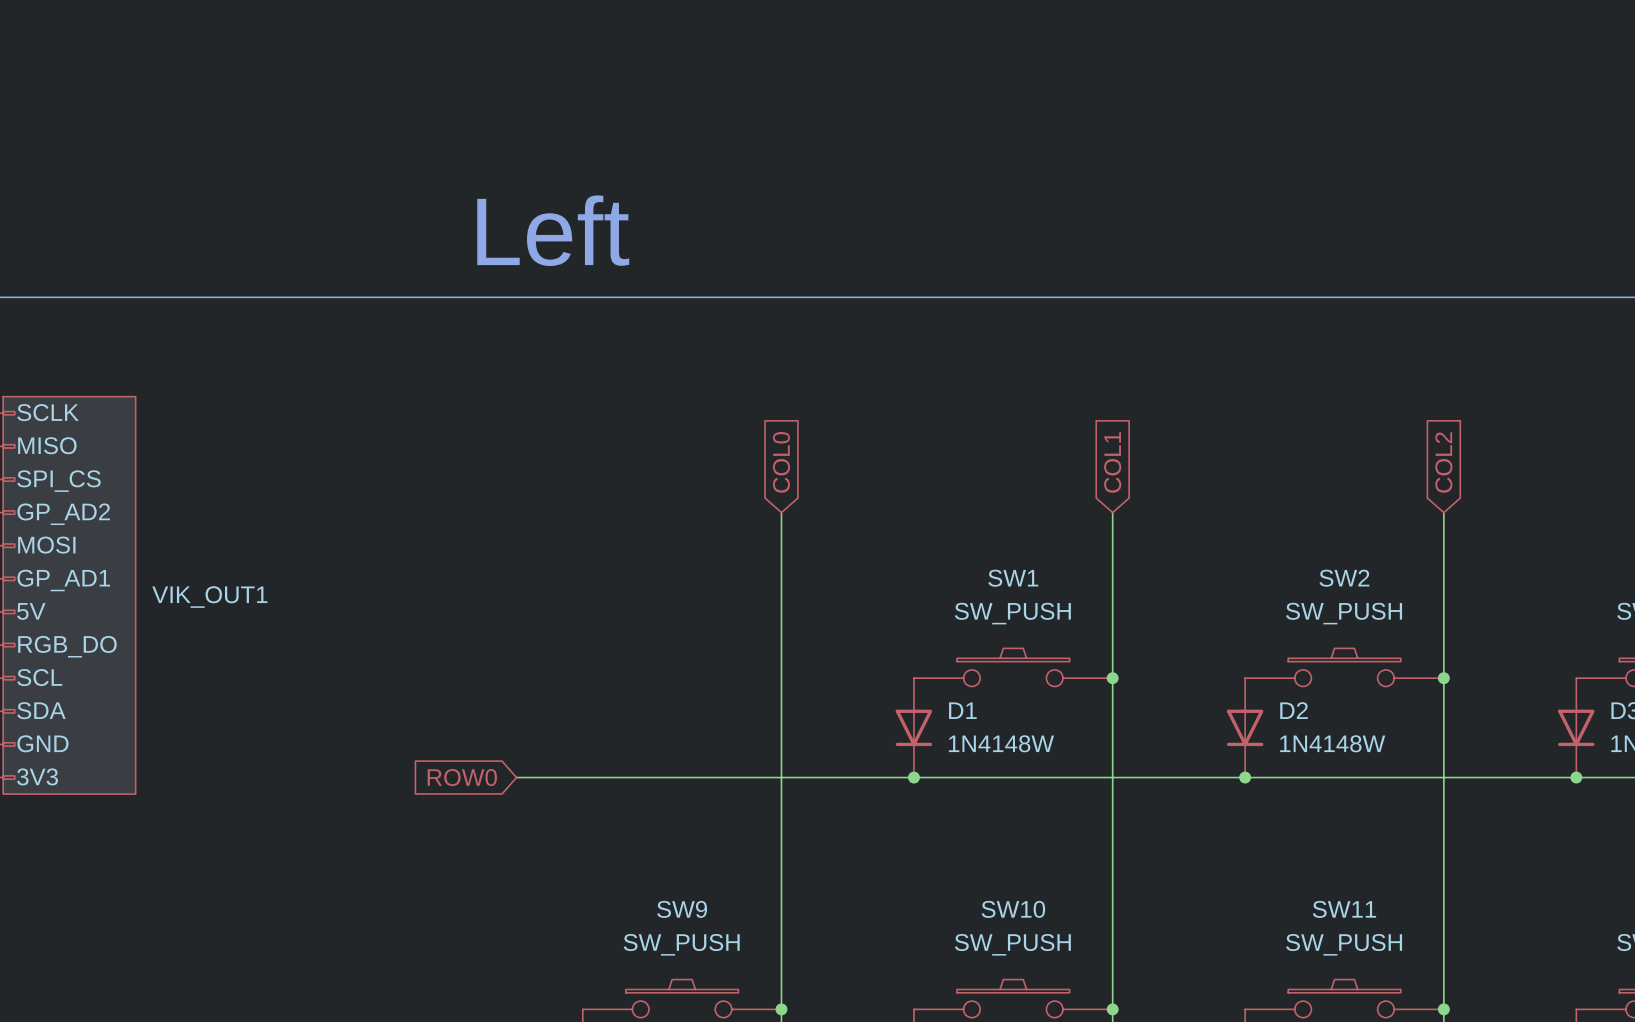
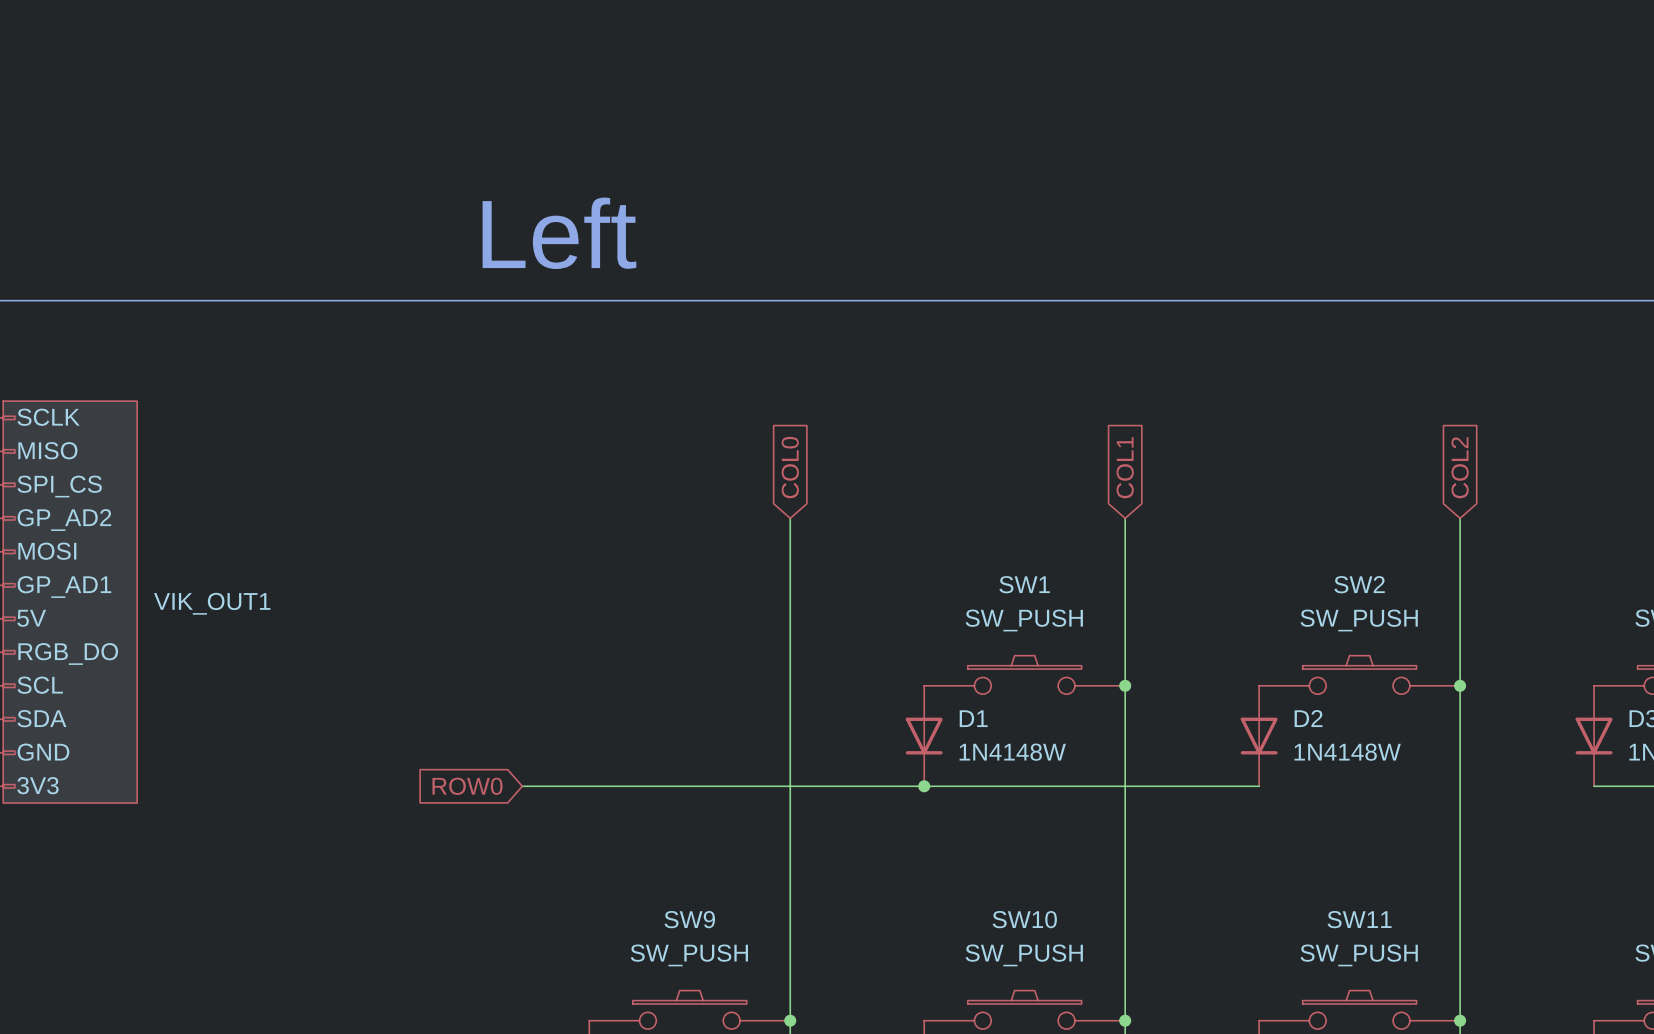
wire: (1245, 777) (1576, 777) -> none
junction: (1245, 777) -> none
junction: (1576, 777) -> none

